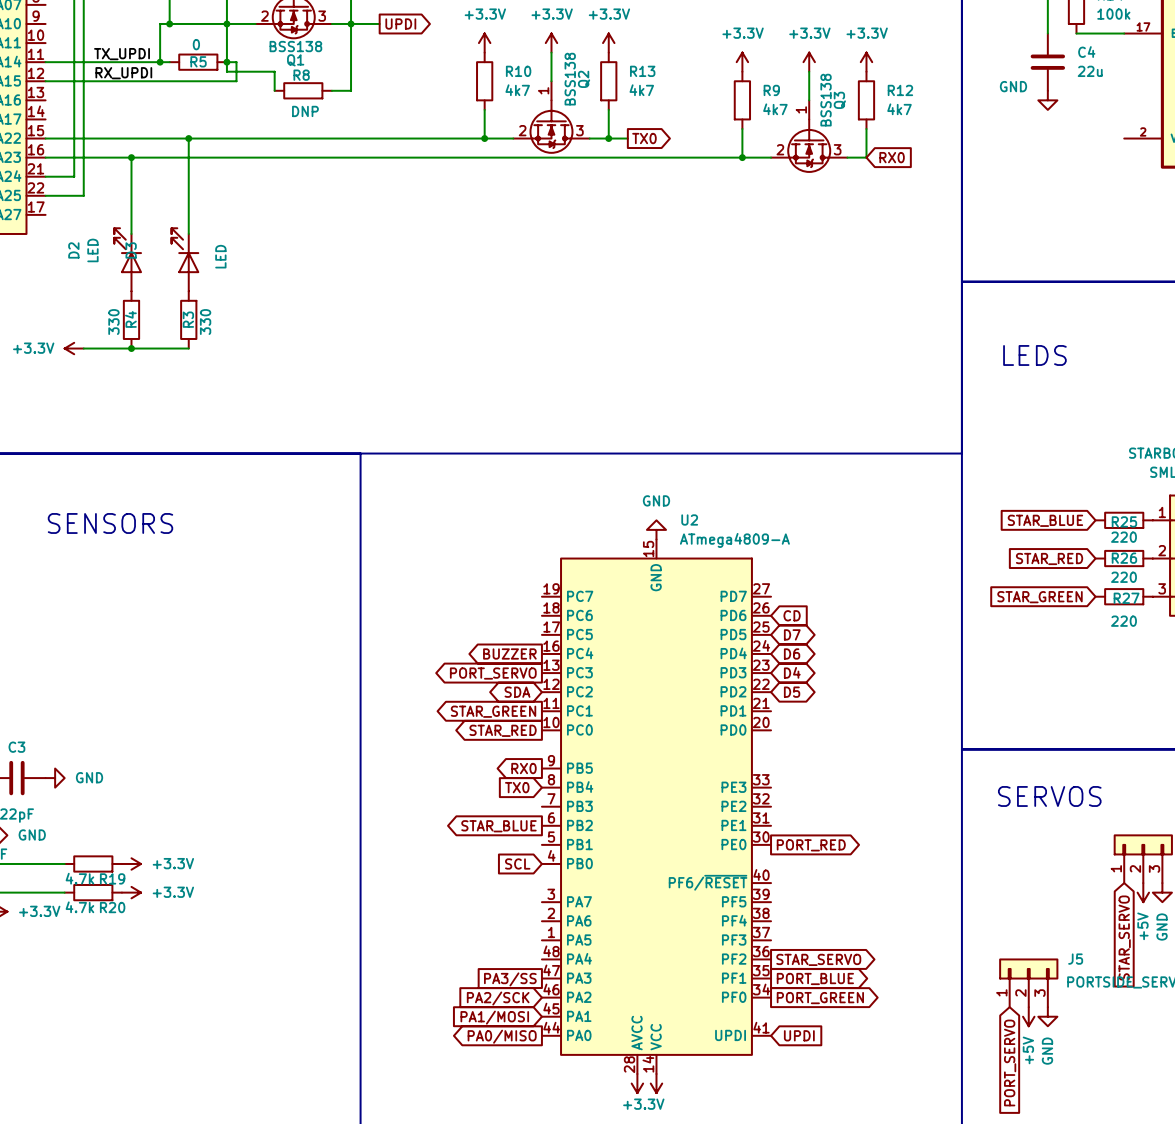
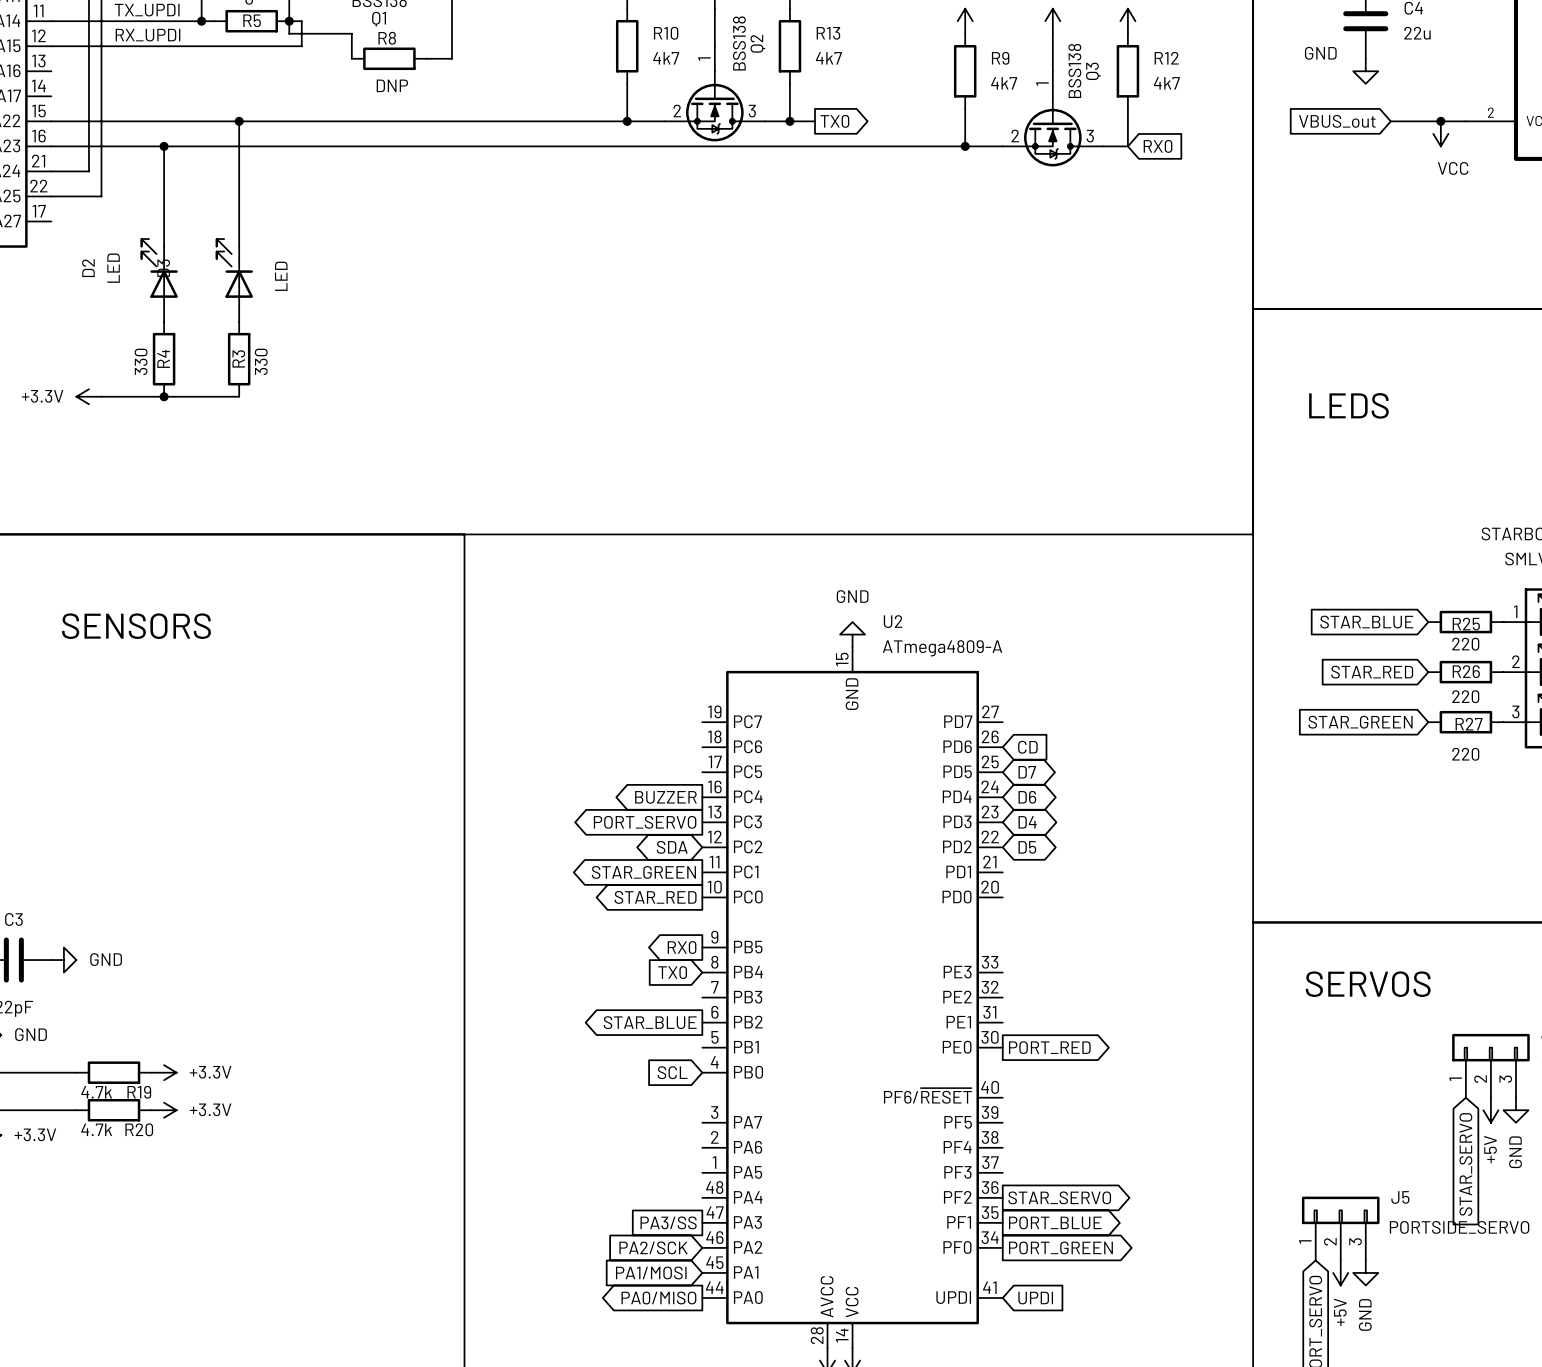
global label: none -> VBUS_out (1337, 121)
wire: none -> (1390, 121) (1465, 121)
junction: none -> (1440, 121)
power symbol: none -> VCC (1440, 133)

